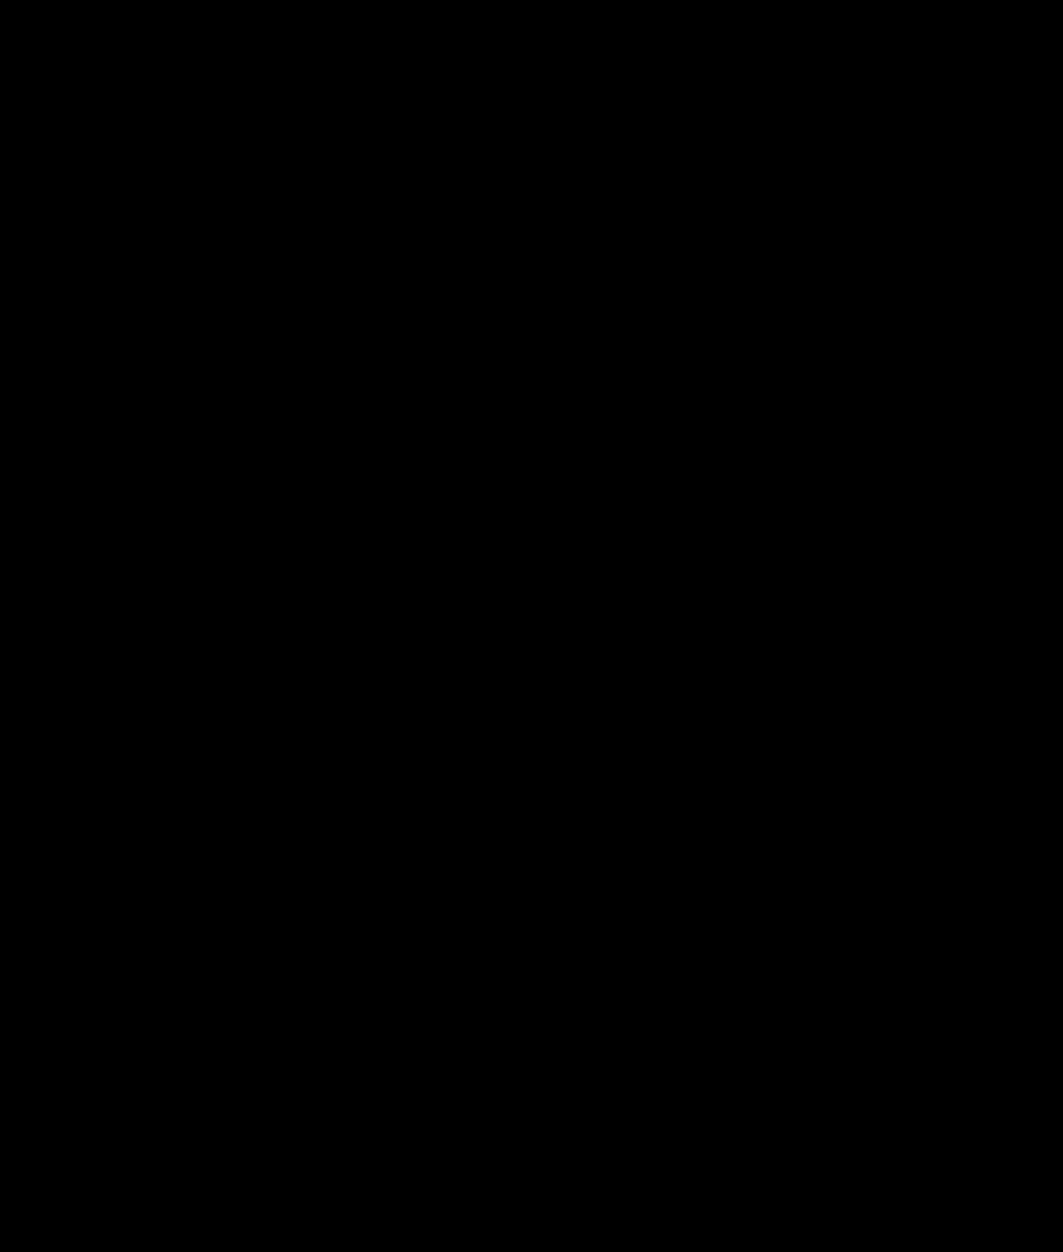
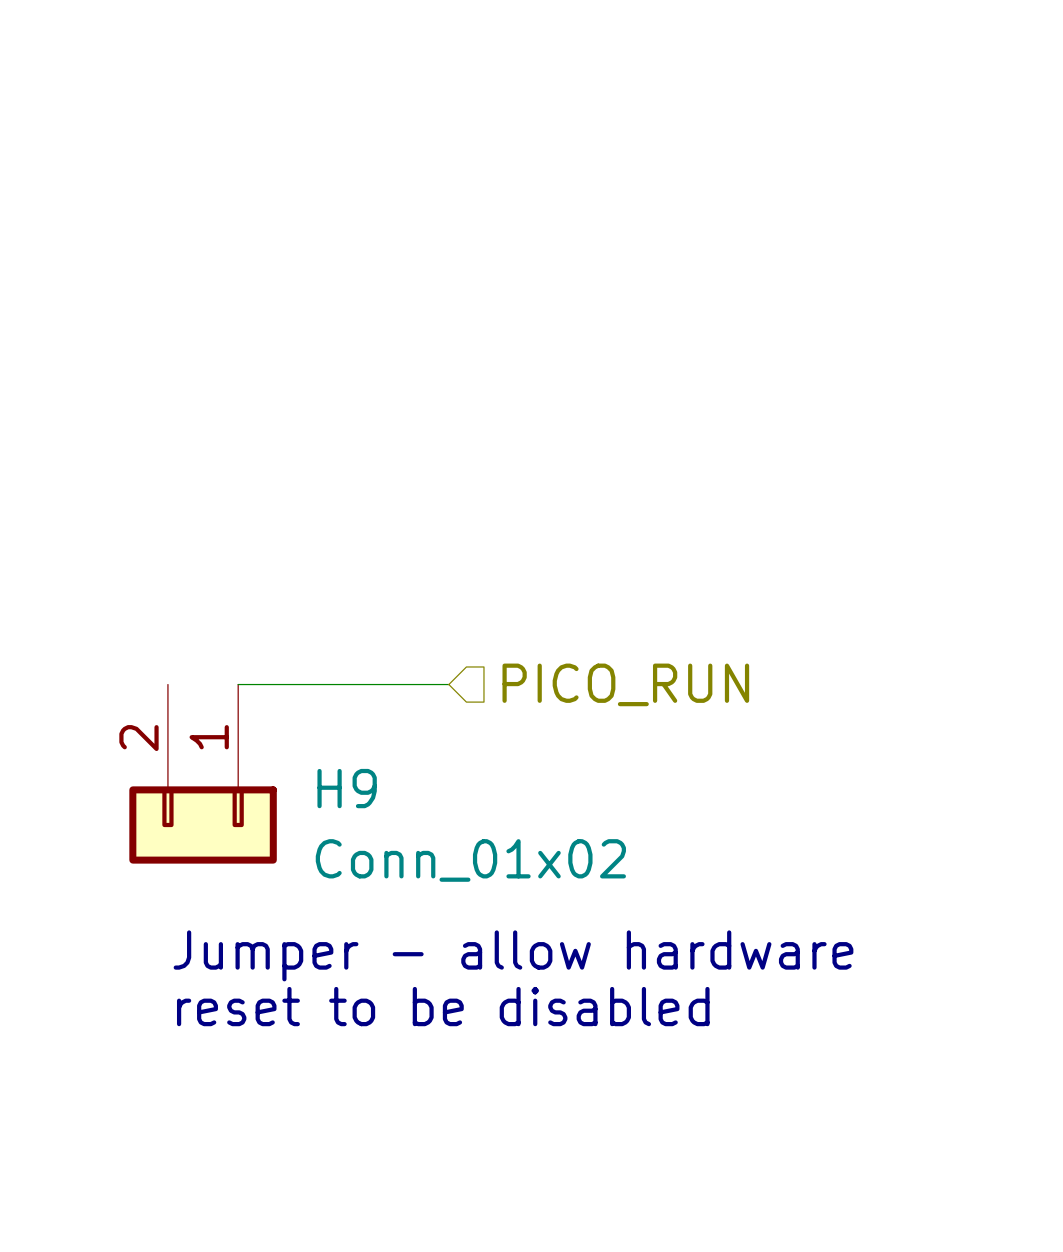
wire: none -> (238, 684) (448, 684)
hierarchical label: none -> PICO_RUN (625, 684)
H9: none -> Conn_01x02 (203, 774)
text: none -> Jumper - allow hardware (513, 955)
text: none -> reset to be disabled (443, 1006)

